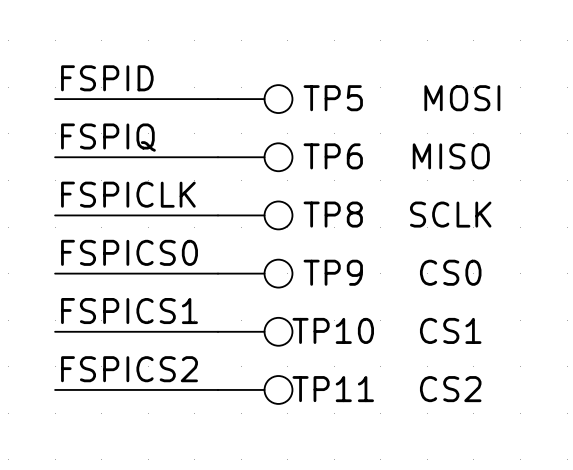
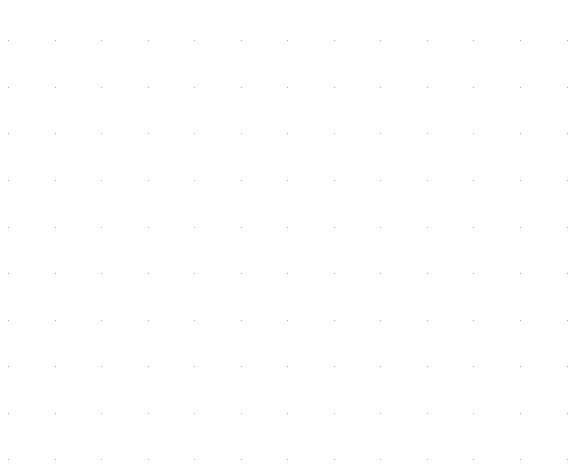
label: FSPID (107, 78) -> none
wire: (55, 99) (217, 99) -> none
TP5: MOSI (255, 99) -> none
label: FSPIQ (108, 137) -> none
wire: (55, 157) (217, 157) -> none
TP6: MISO (255, 157) -> none
label: FSPICLK (128, 194) -> none
wire: (55, 215) (217, 215) -> none
TP8: SCLK (255, 215) -> none
label: FSPICS0 (129, 252) -> none
wire: (55, 273) (217, 273) -> none
TP9: CS0 (255, 273) -> none
label: FSPICS1 (129, 311) -> none
wire: (55, 331) (217, 331) -> none
TP10: CS1 (255, 331) -> none
label: FSPICS2 (129, 369) -> none
wire: (55, 389) (217, 389) -> none
TP11: CS2 (255, 389) -> none

